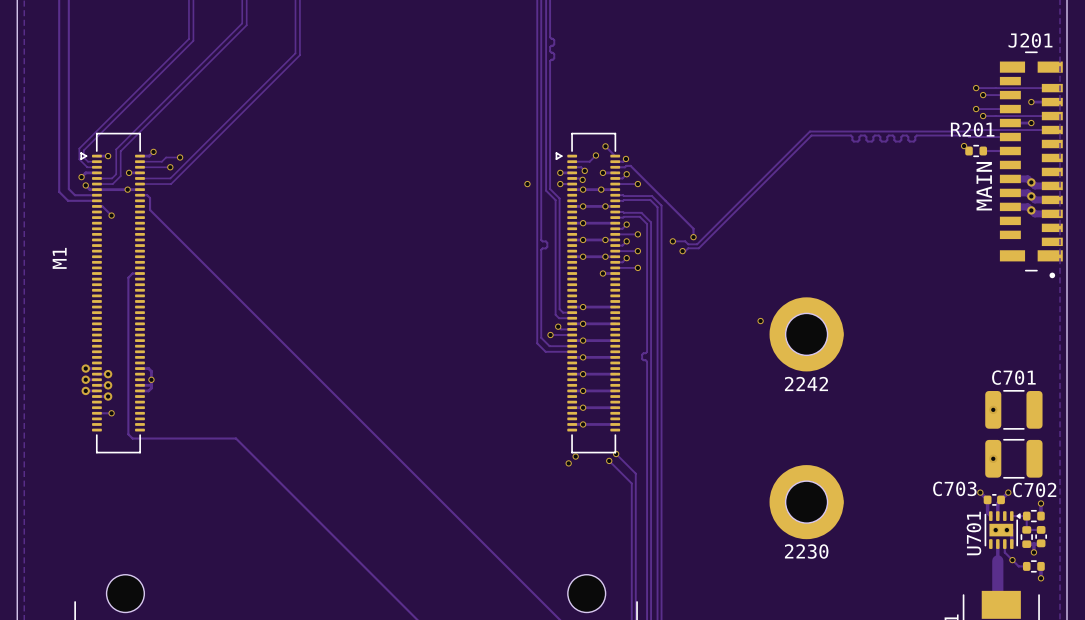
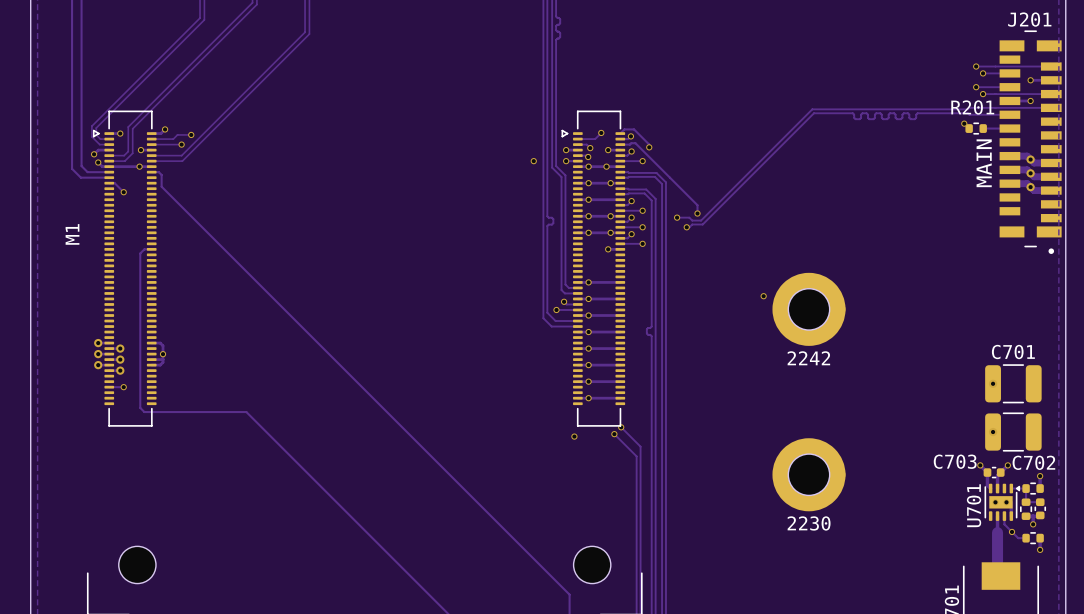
track: (605, 146) (615, 156) -> (649, 147) (649, 144) (634, 129) (624, 129) (620, 133)
via position: (605, 146) -> (649, 147)
via: (575, 456) -> none

